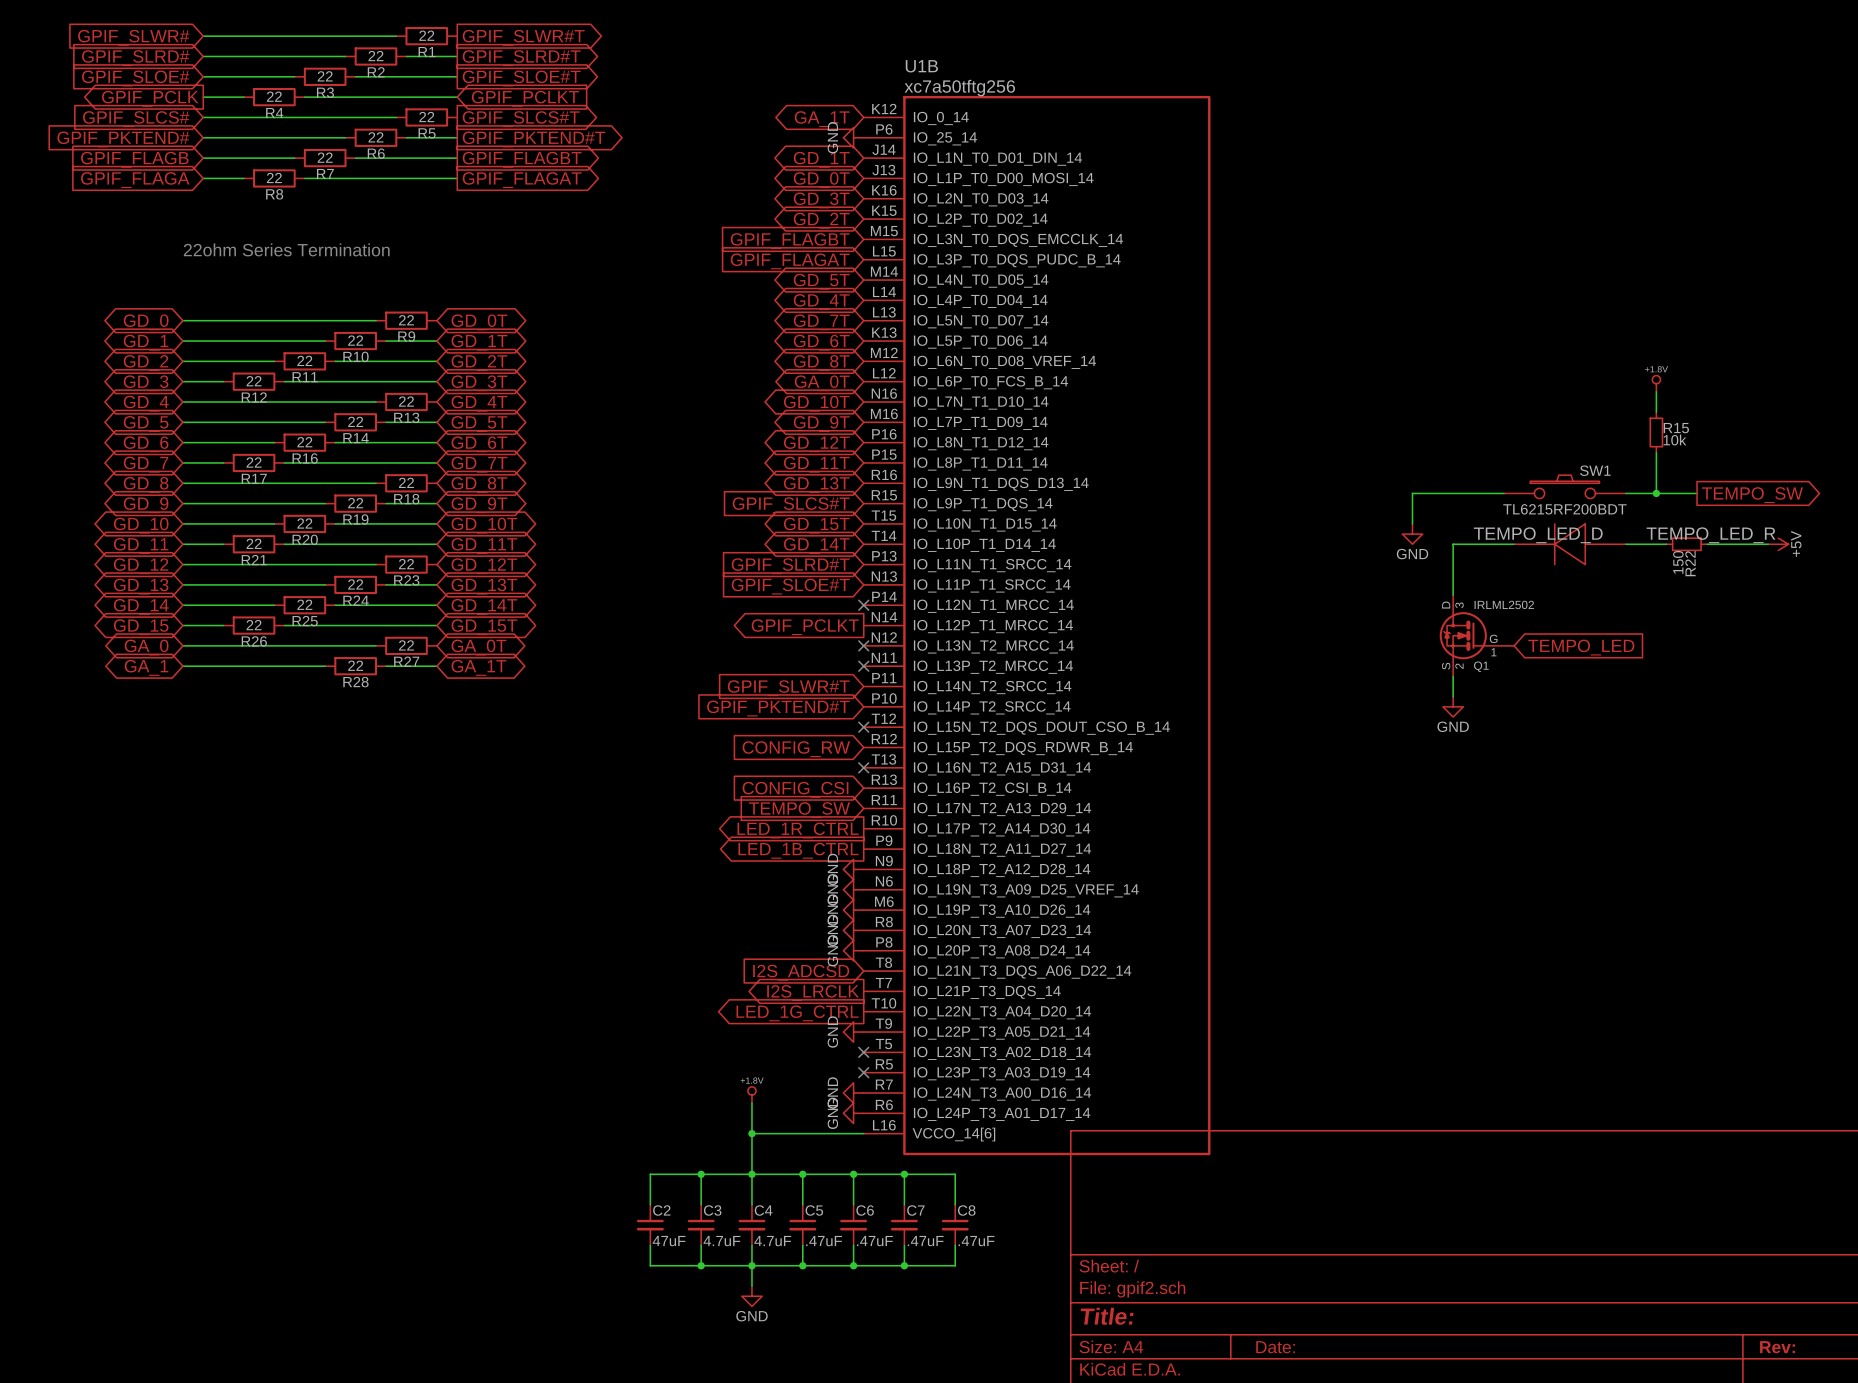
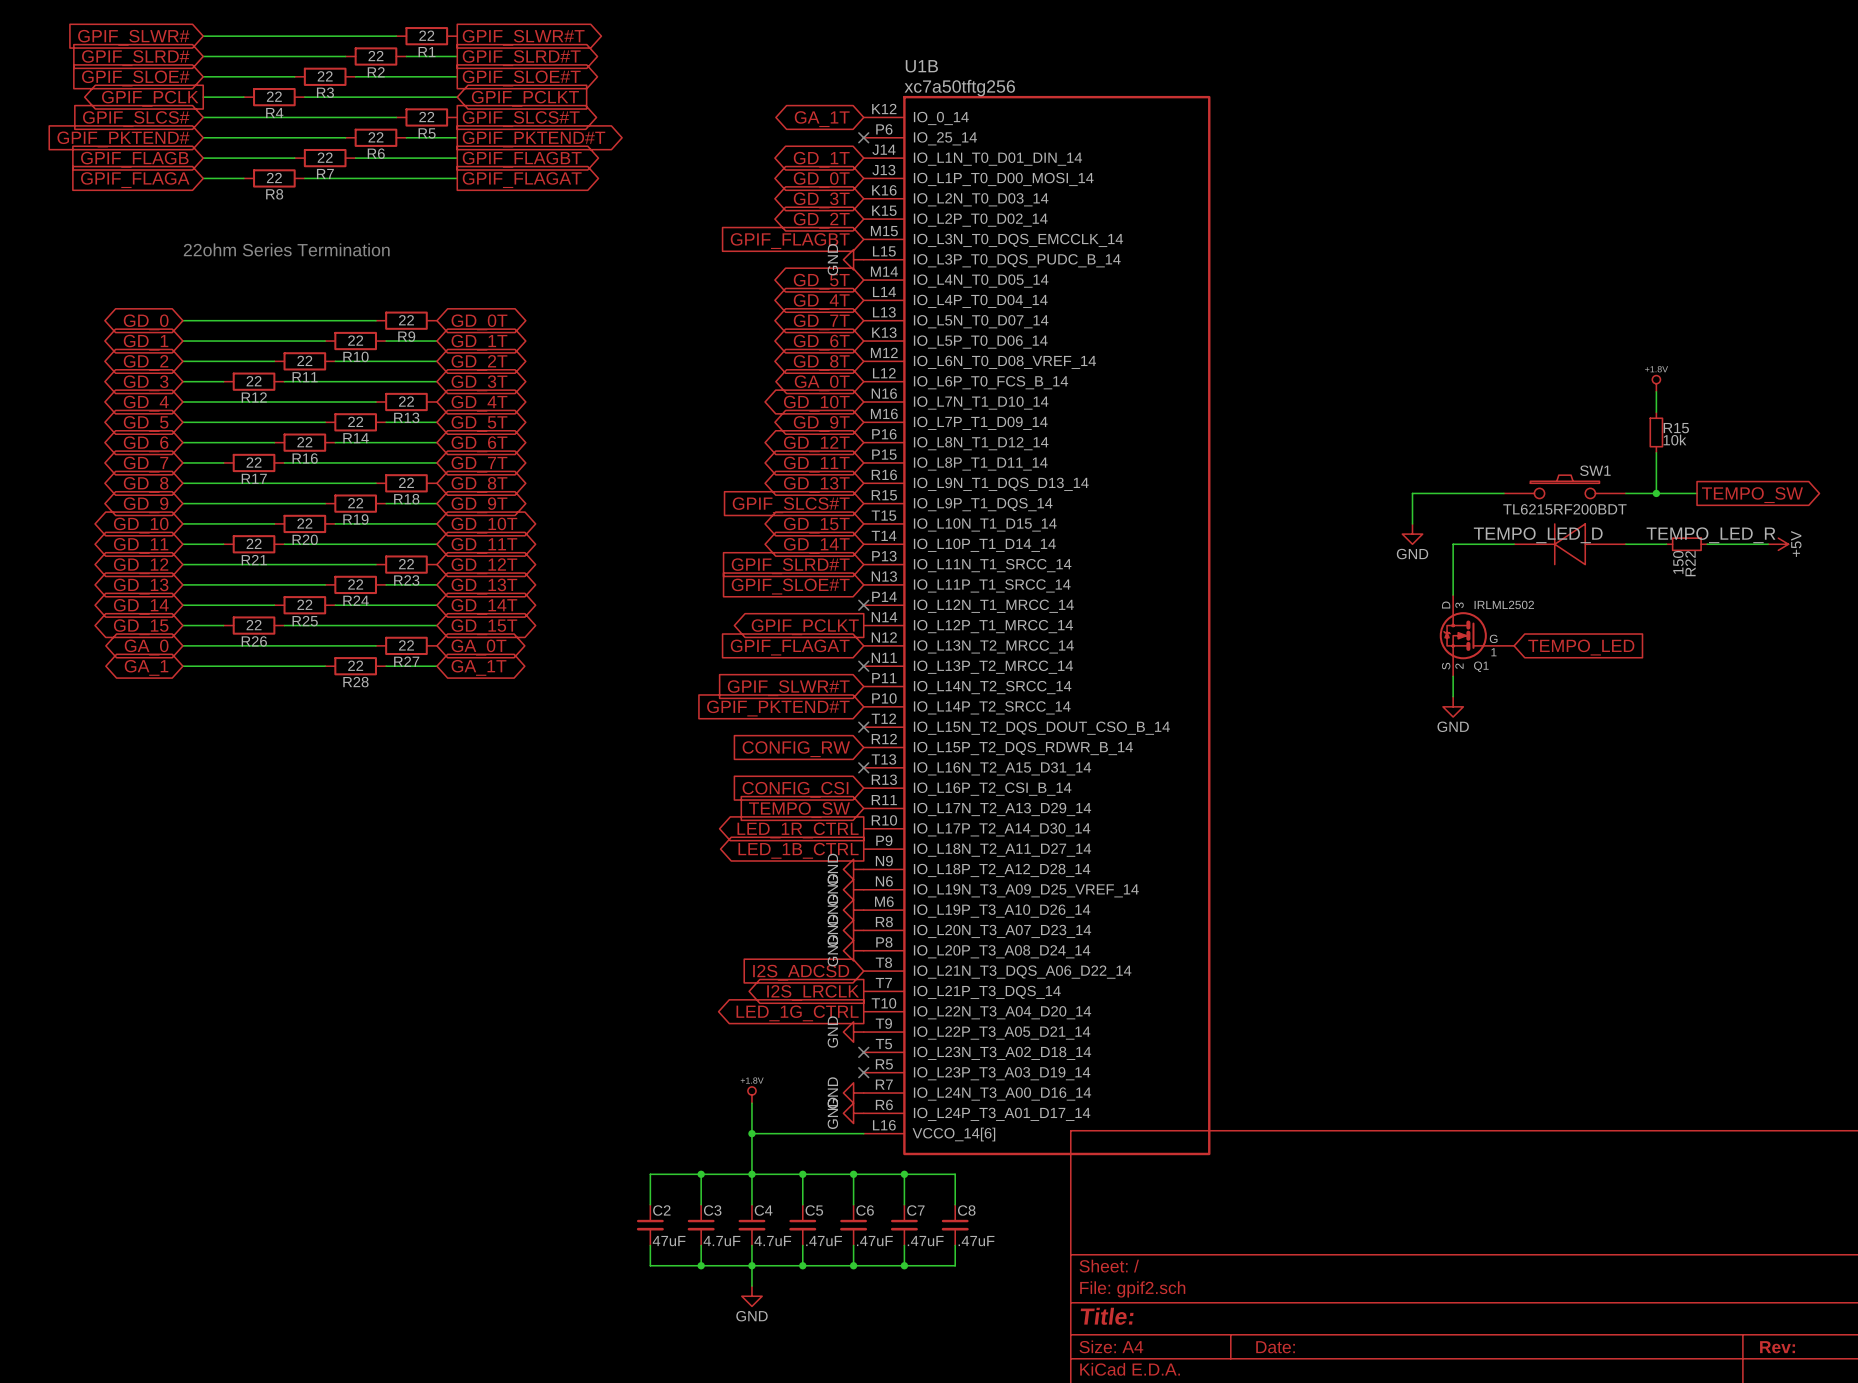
power symbol position: GND (853, 137) -> GND (853, 259)
no-connect mark: none -> (863, 137)
global label: GPIF_FLAGAT (790, 261) -> none
no-connect mark: (863, 645) -> none
global label: none -> GPIF_FLAGAT (790, 647)

